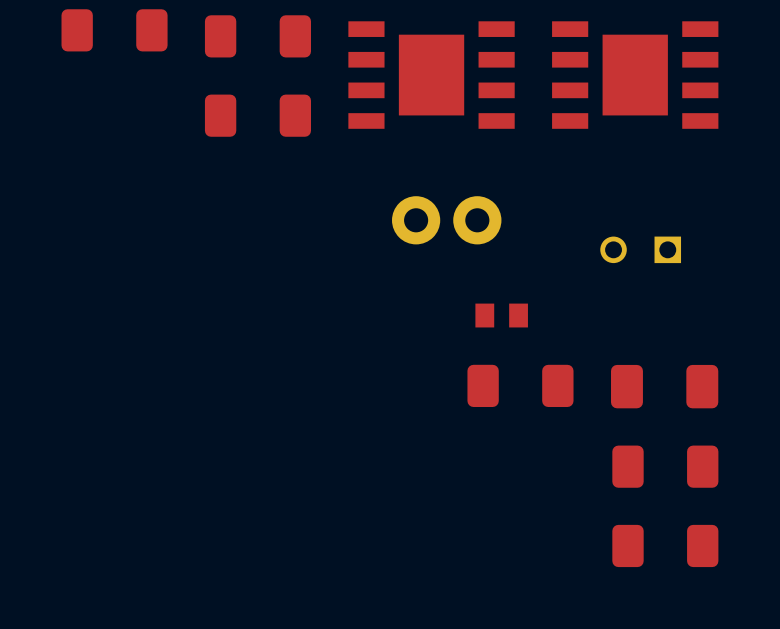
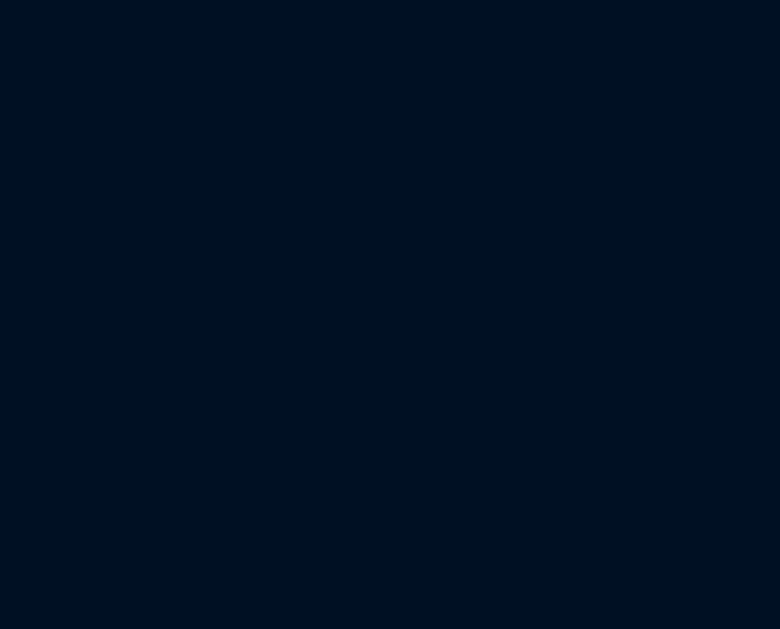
part: (114, 30) -> none
part: (257, 36) -> none
part: (431, 75) -> none
part: (635, 75) -> none
part: (257, 115) -> none
part: (446, 220) -> none
part: (640, 249) -> none
part: (501, 315) -> none
part: (520, 385) -> none
part: (664, 386) -> none
part: (665, 466) -> none
part: (665, 545) -> none

